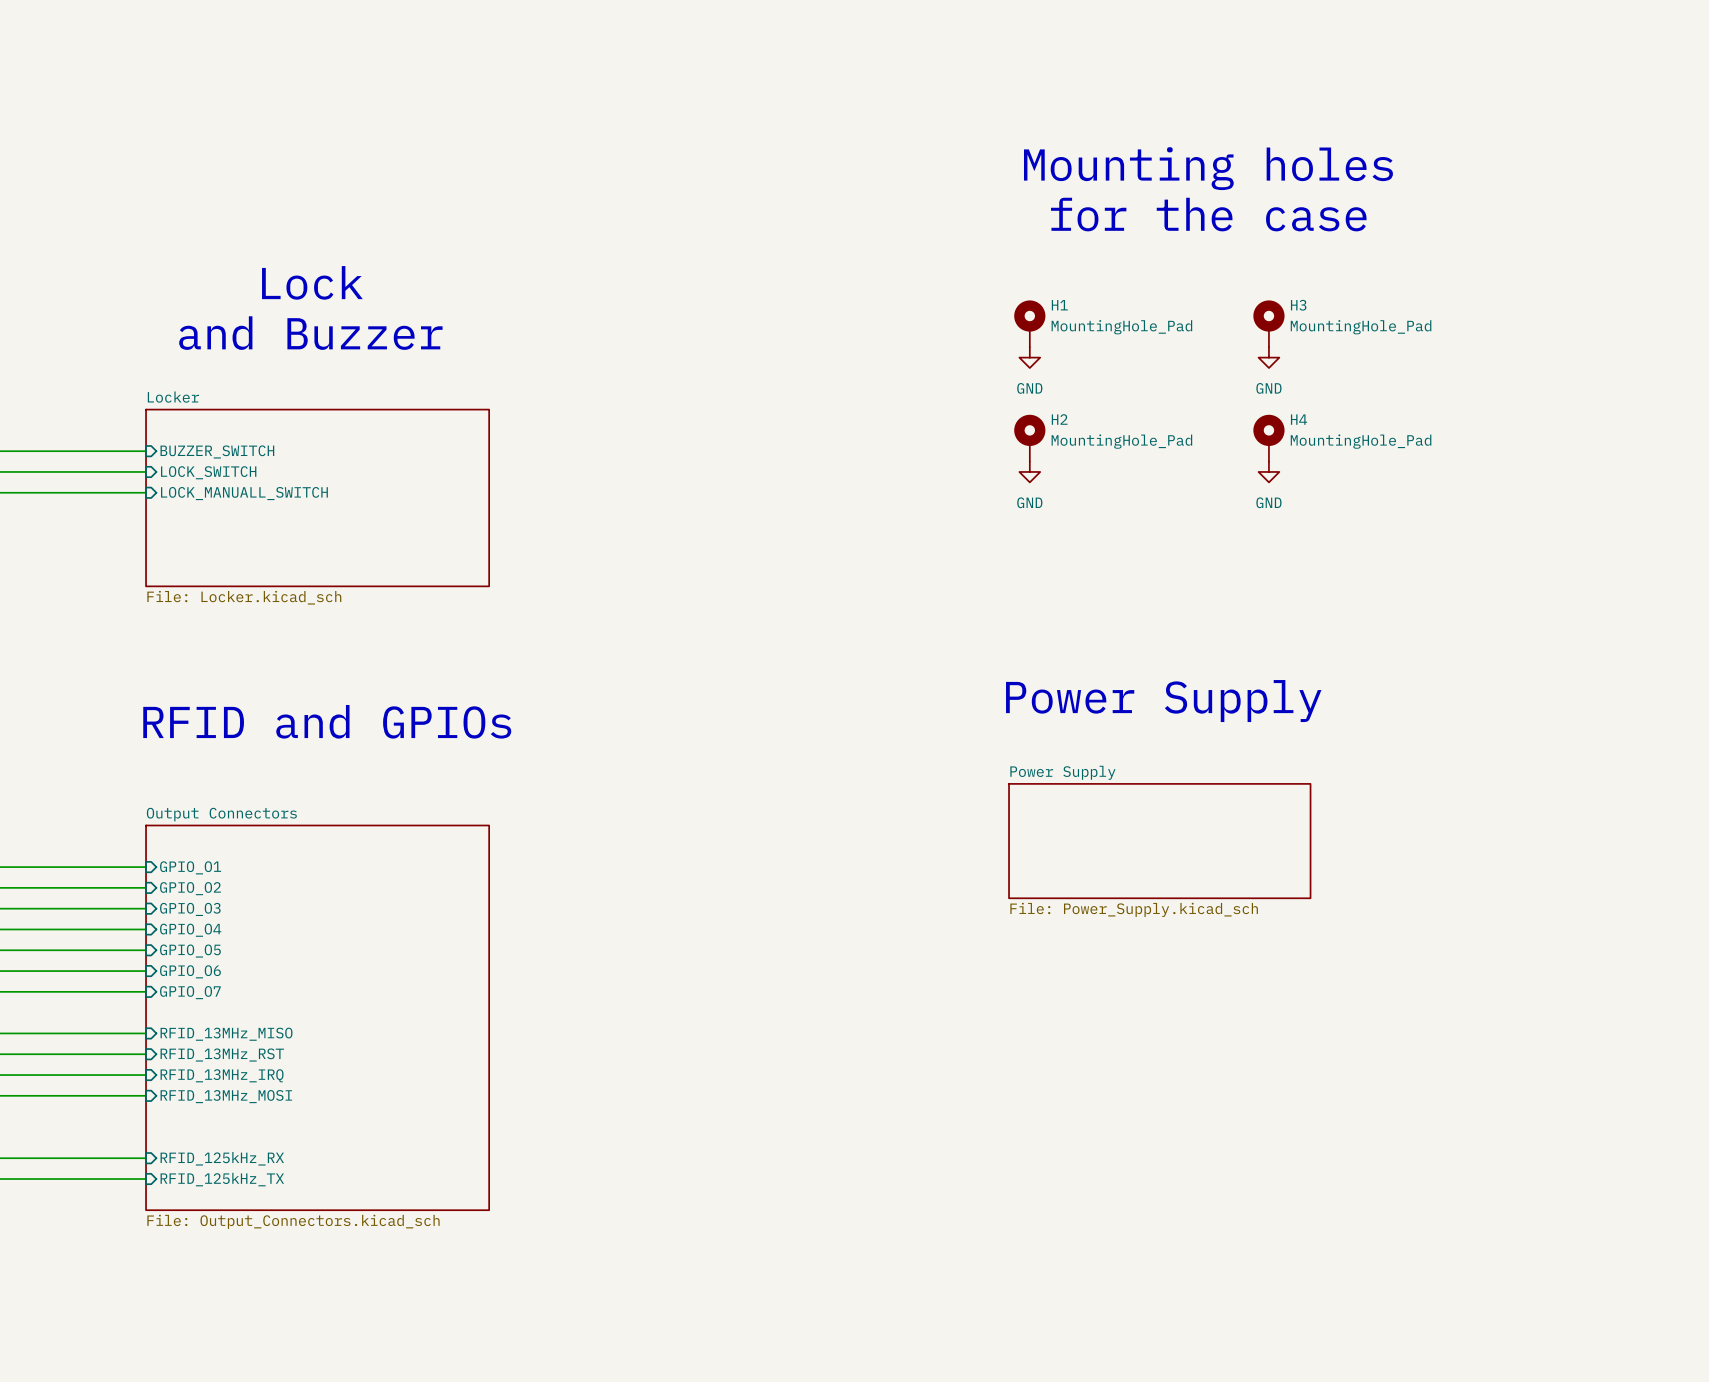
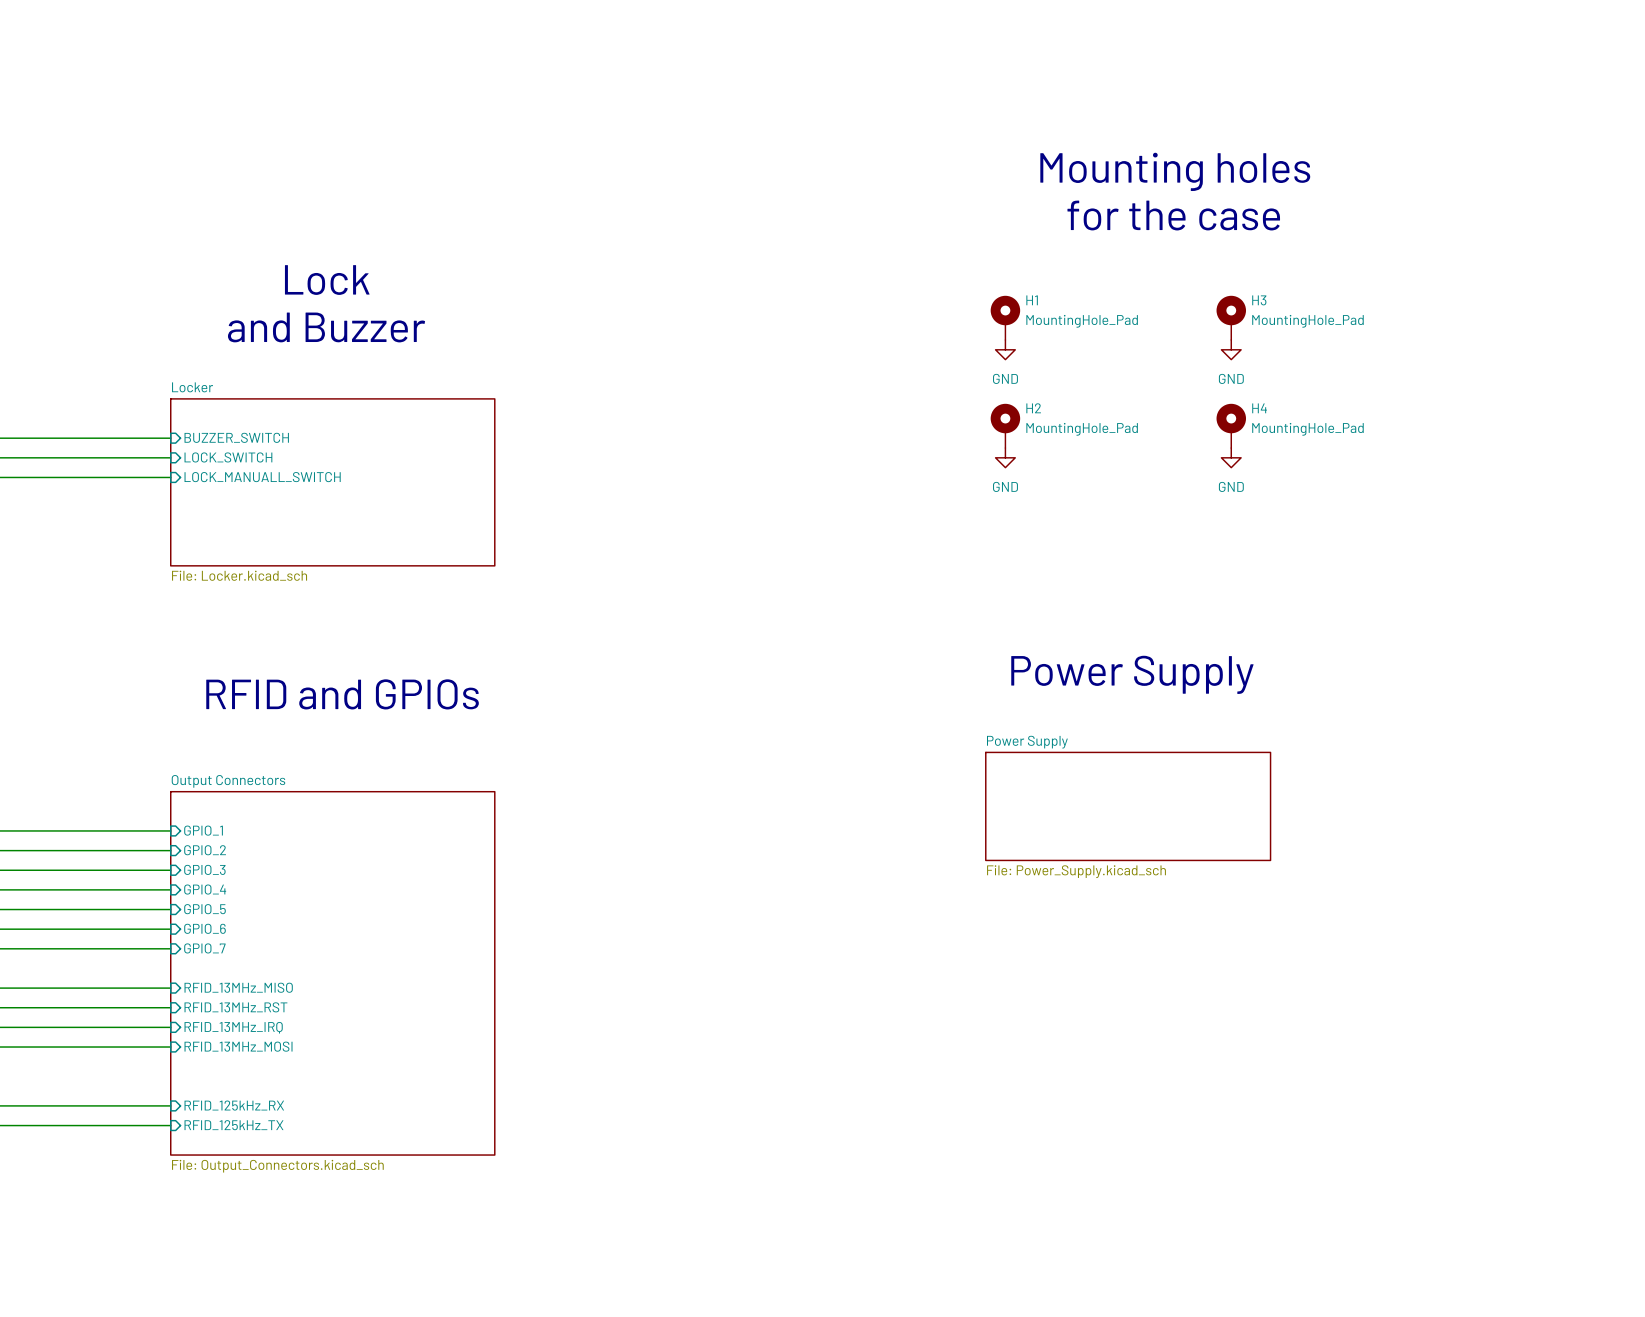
sheet pin: GPIO_O1 (190, 867) -> GPIO_1 (203, 830)
sheet pin: GPIO_O2 (190, 888) -> GPIO_2 (205, 850)
sheet pin: GPIO_O3 (190, 909) -> GPIO_3 (204, 869)
sheet pin: GPIO_O4 (190, 930) -> GPIO_4 (205, 889)
sheet pin: GPIO_O5 (190, 951) -> GPIO_5 (205, 909)
sheet pin: GPIO_O6 (190, 971) -> GPIO_6 (205, 928)
sheet pin: GPIO_O7 (190, 992) -> GPIO_7 (204, 948)

